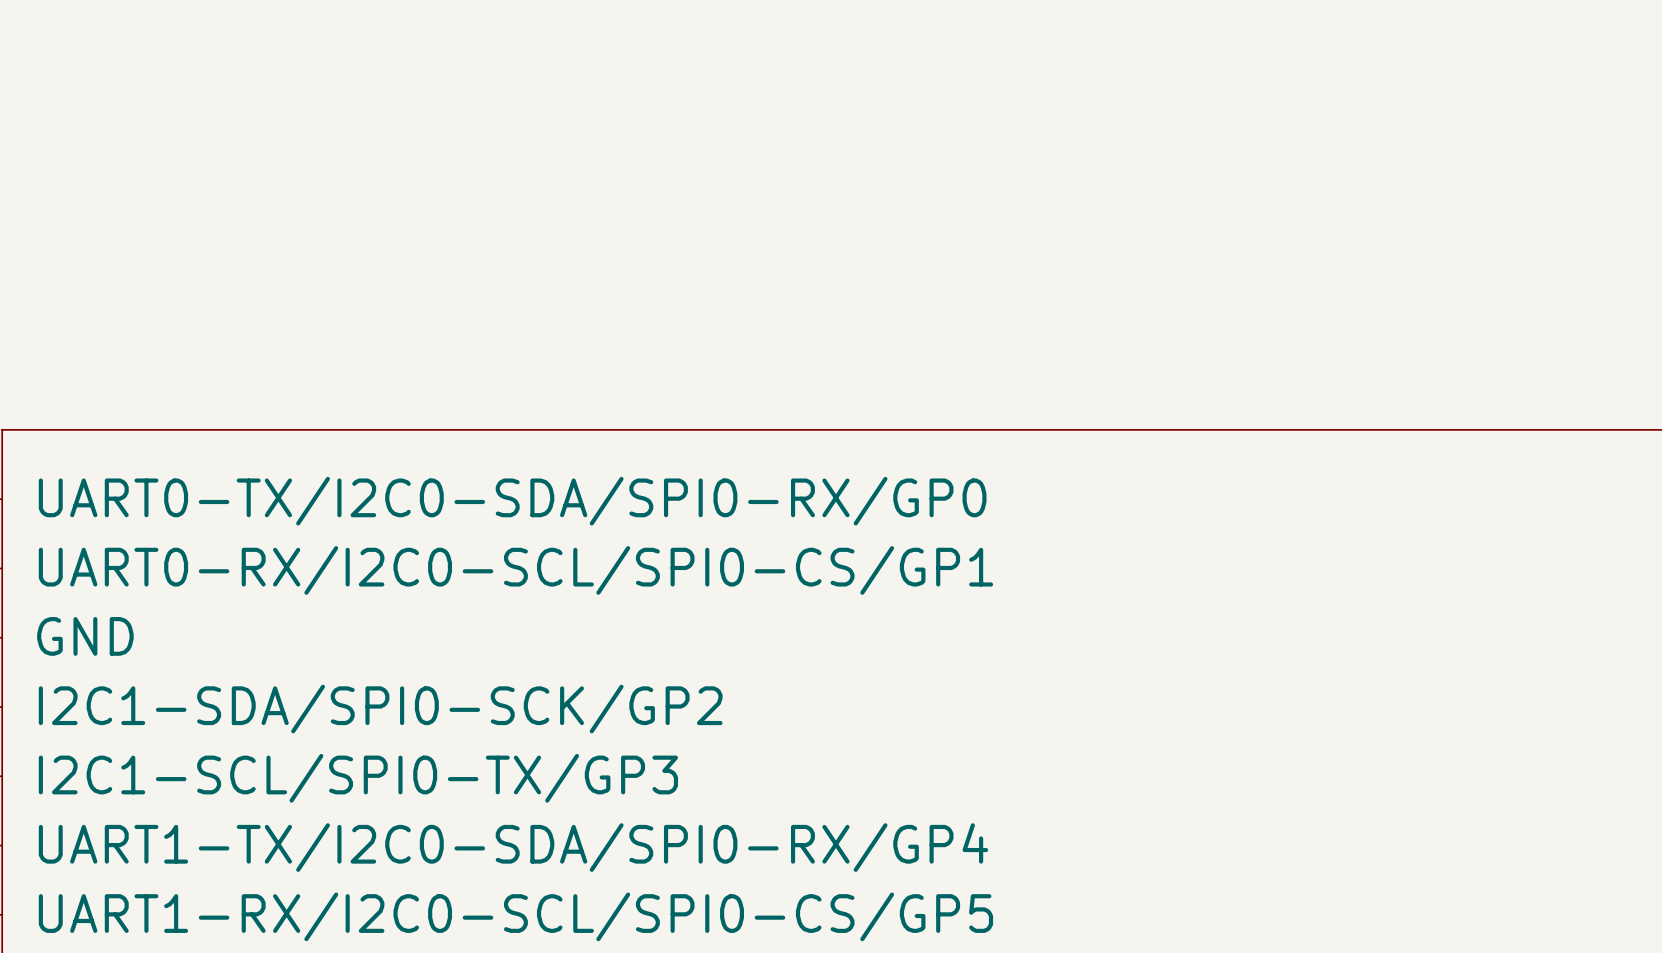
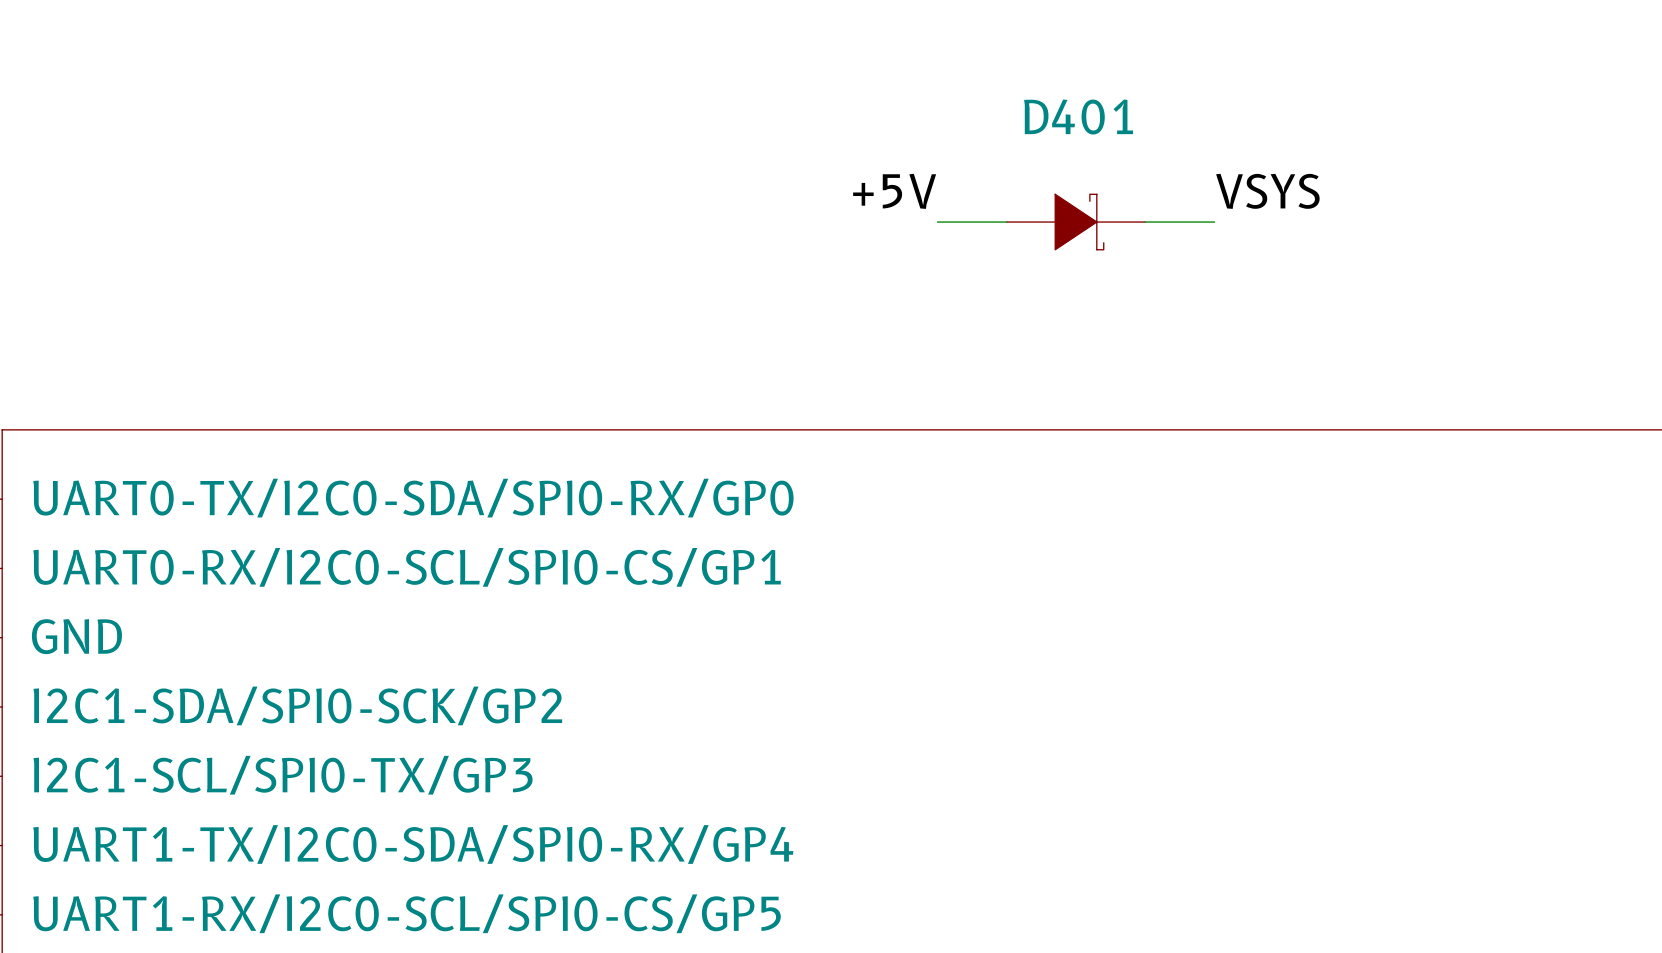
label: none -> +5V (894, 191)
label: none -> VSYS (1267, 191)
wire: none -> (937, 222) (1006, 222)
D401: none -> (1076, 222)
wire: none -> (1145, 222) (1214, 222)

